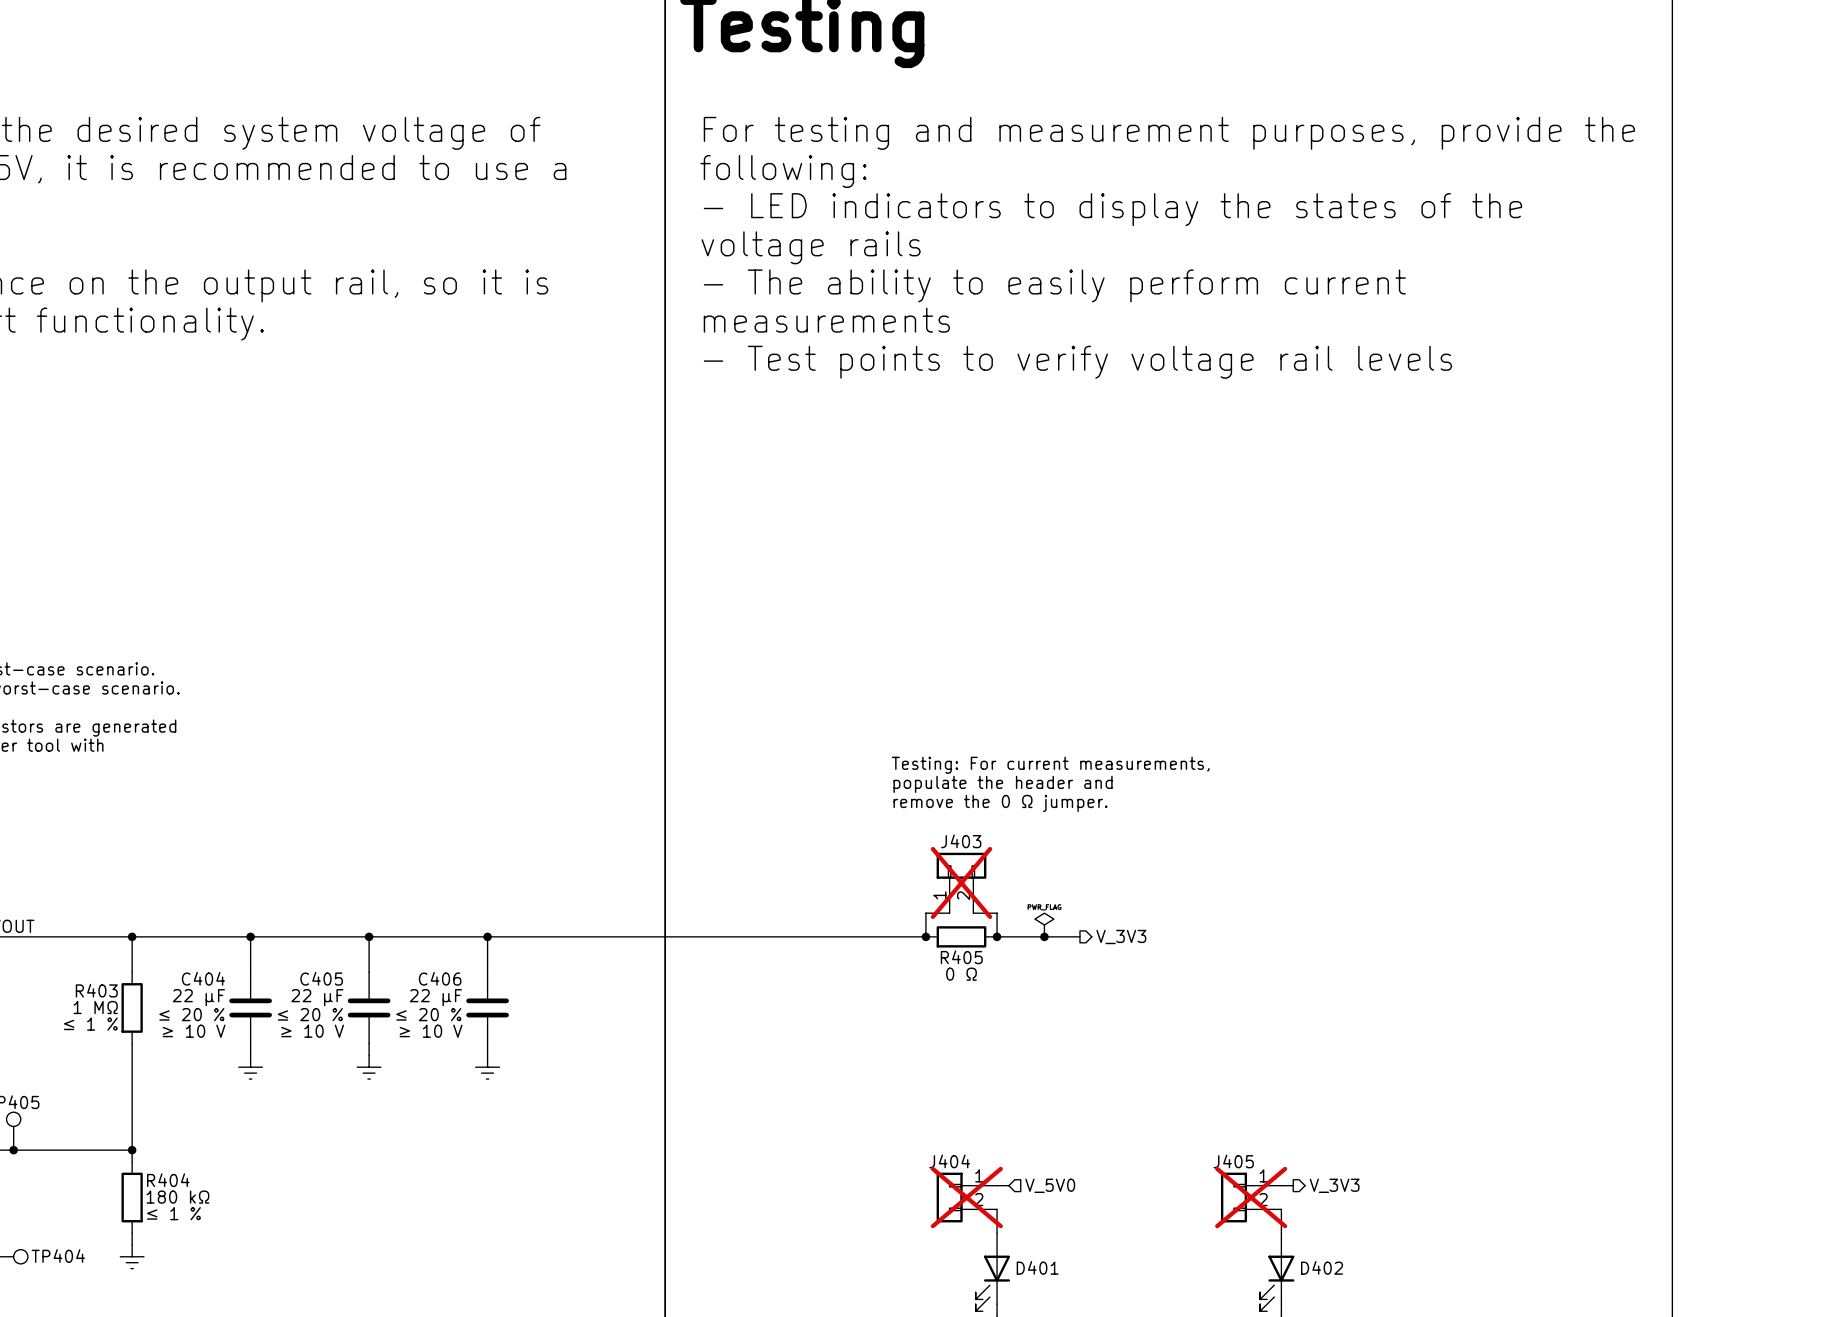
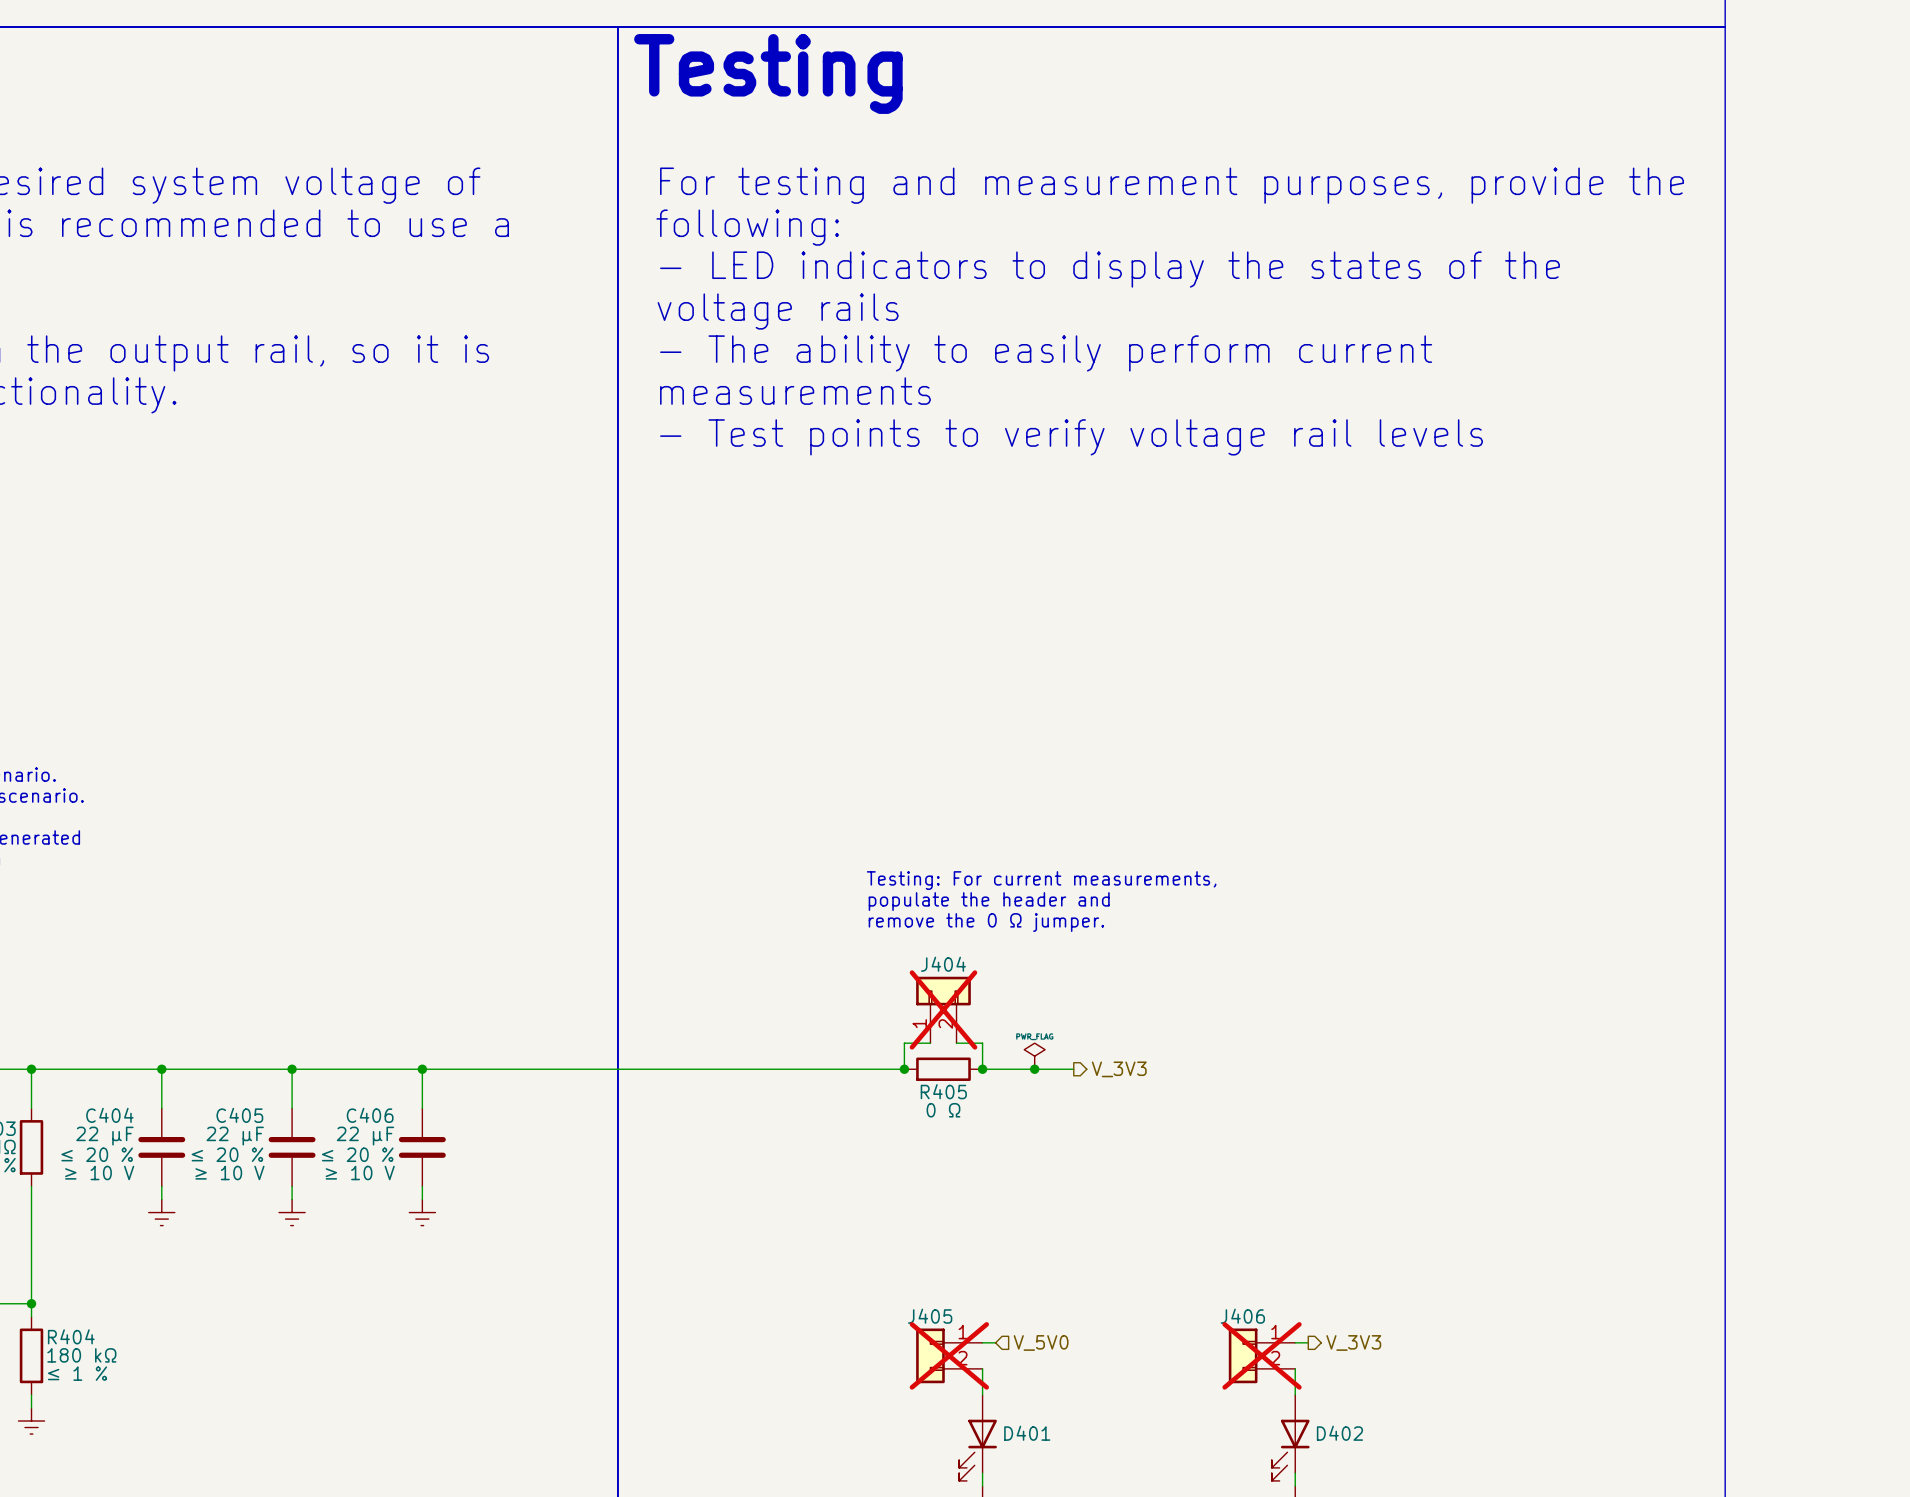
J403 name: J403 (961, 841) -> J404 (943, 964)
J404 name: J404 (949, 1161) -> J405 (930, 1316)
J405 name: J405 (1233, 1161) -> J406 (1242, 1316)

